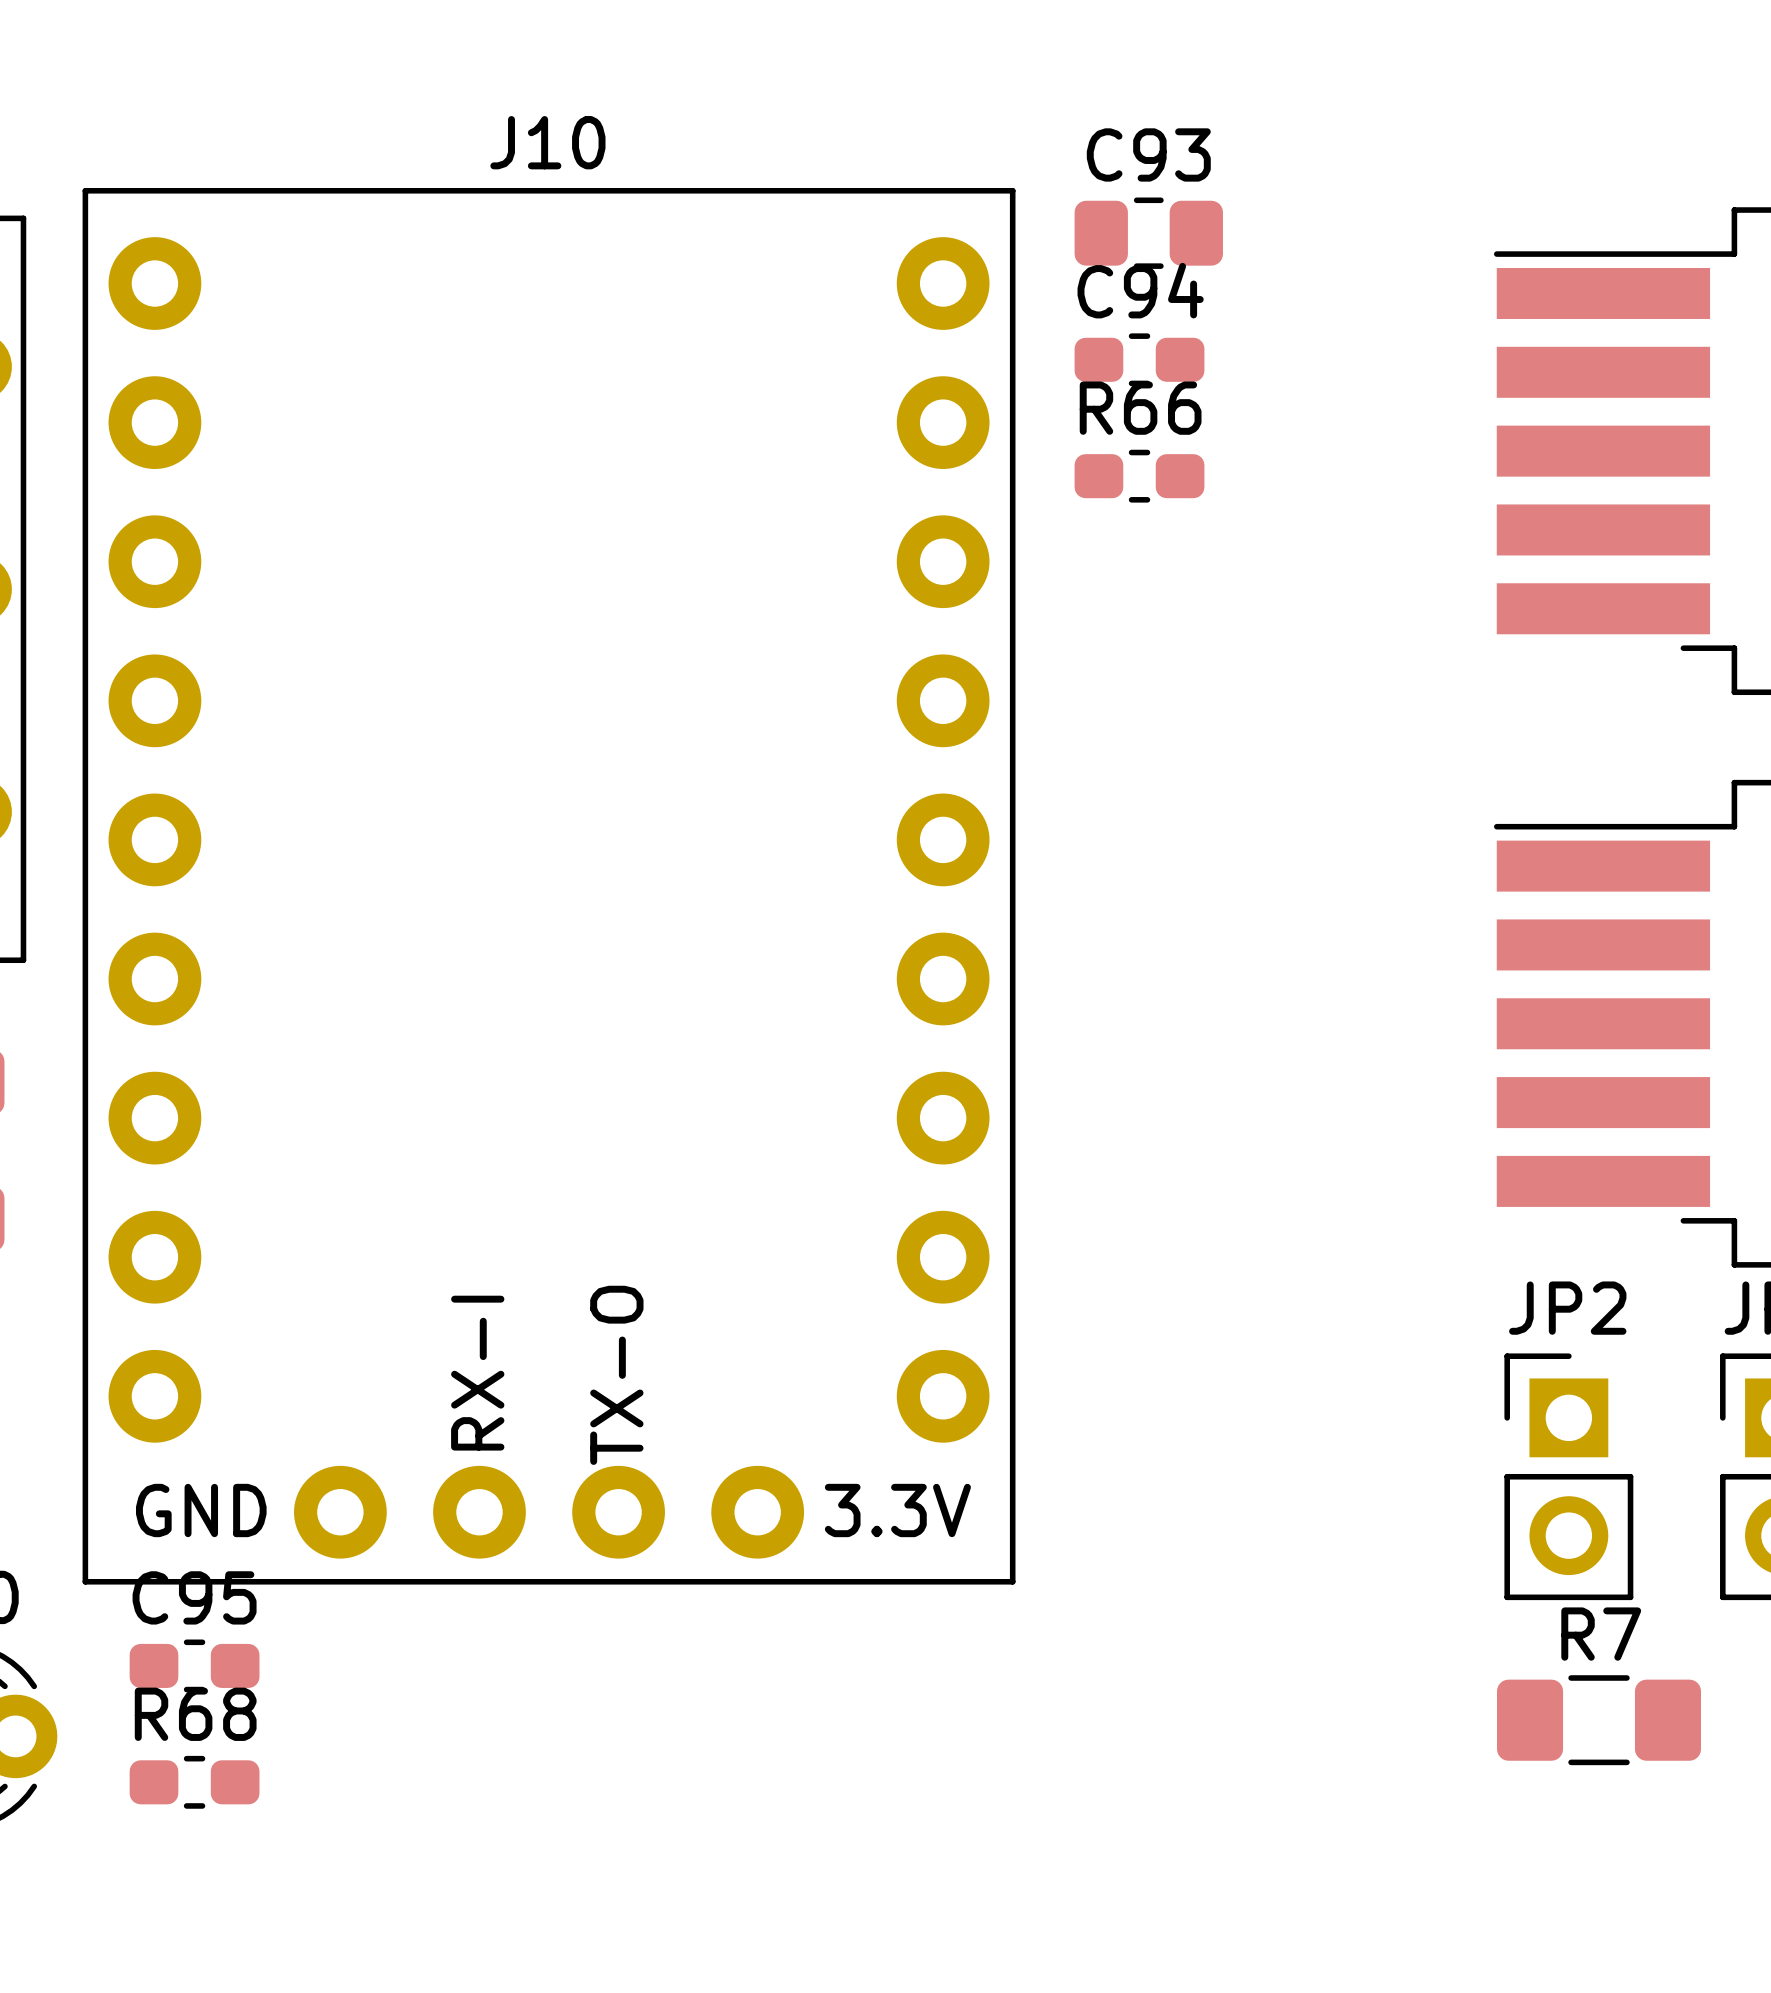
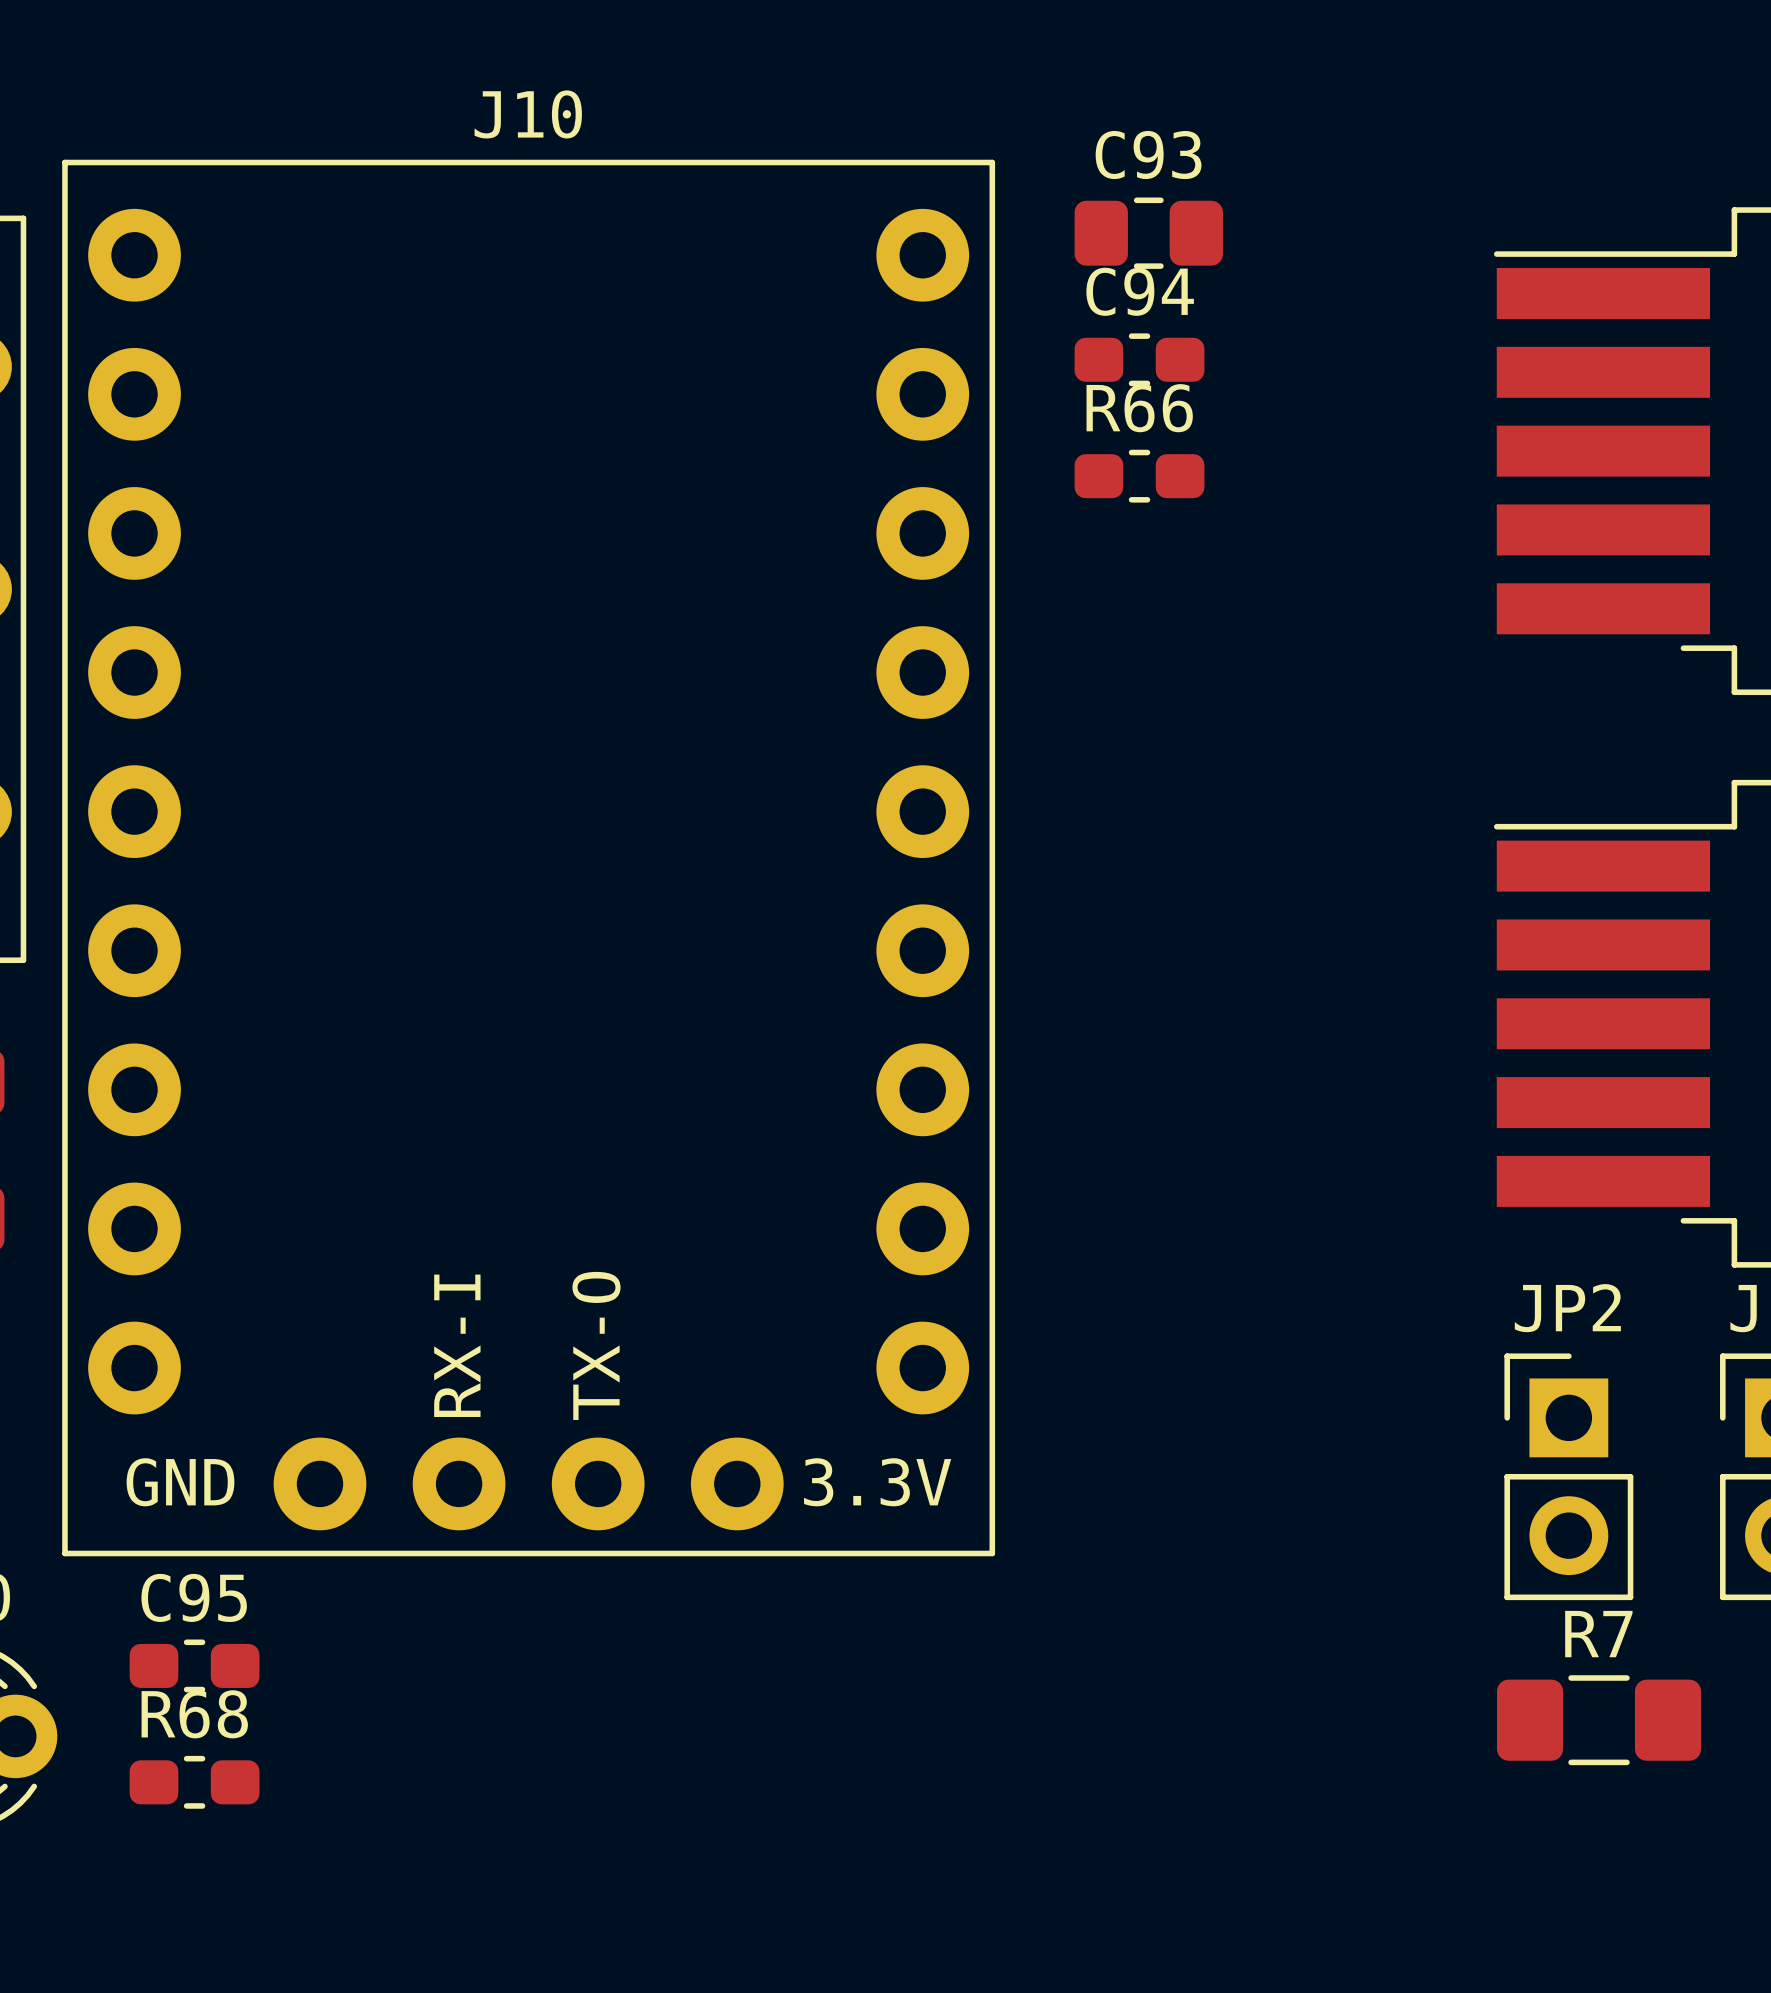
J10 position: (549, 886) -> (528, 858)

